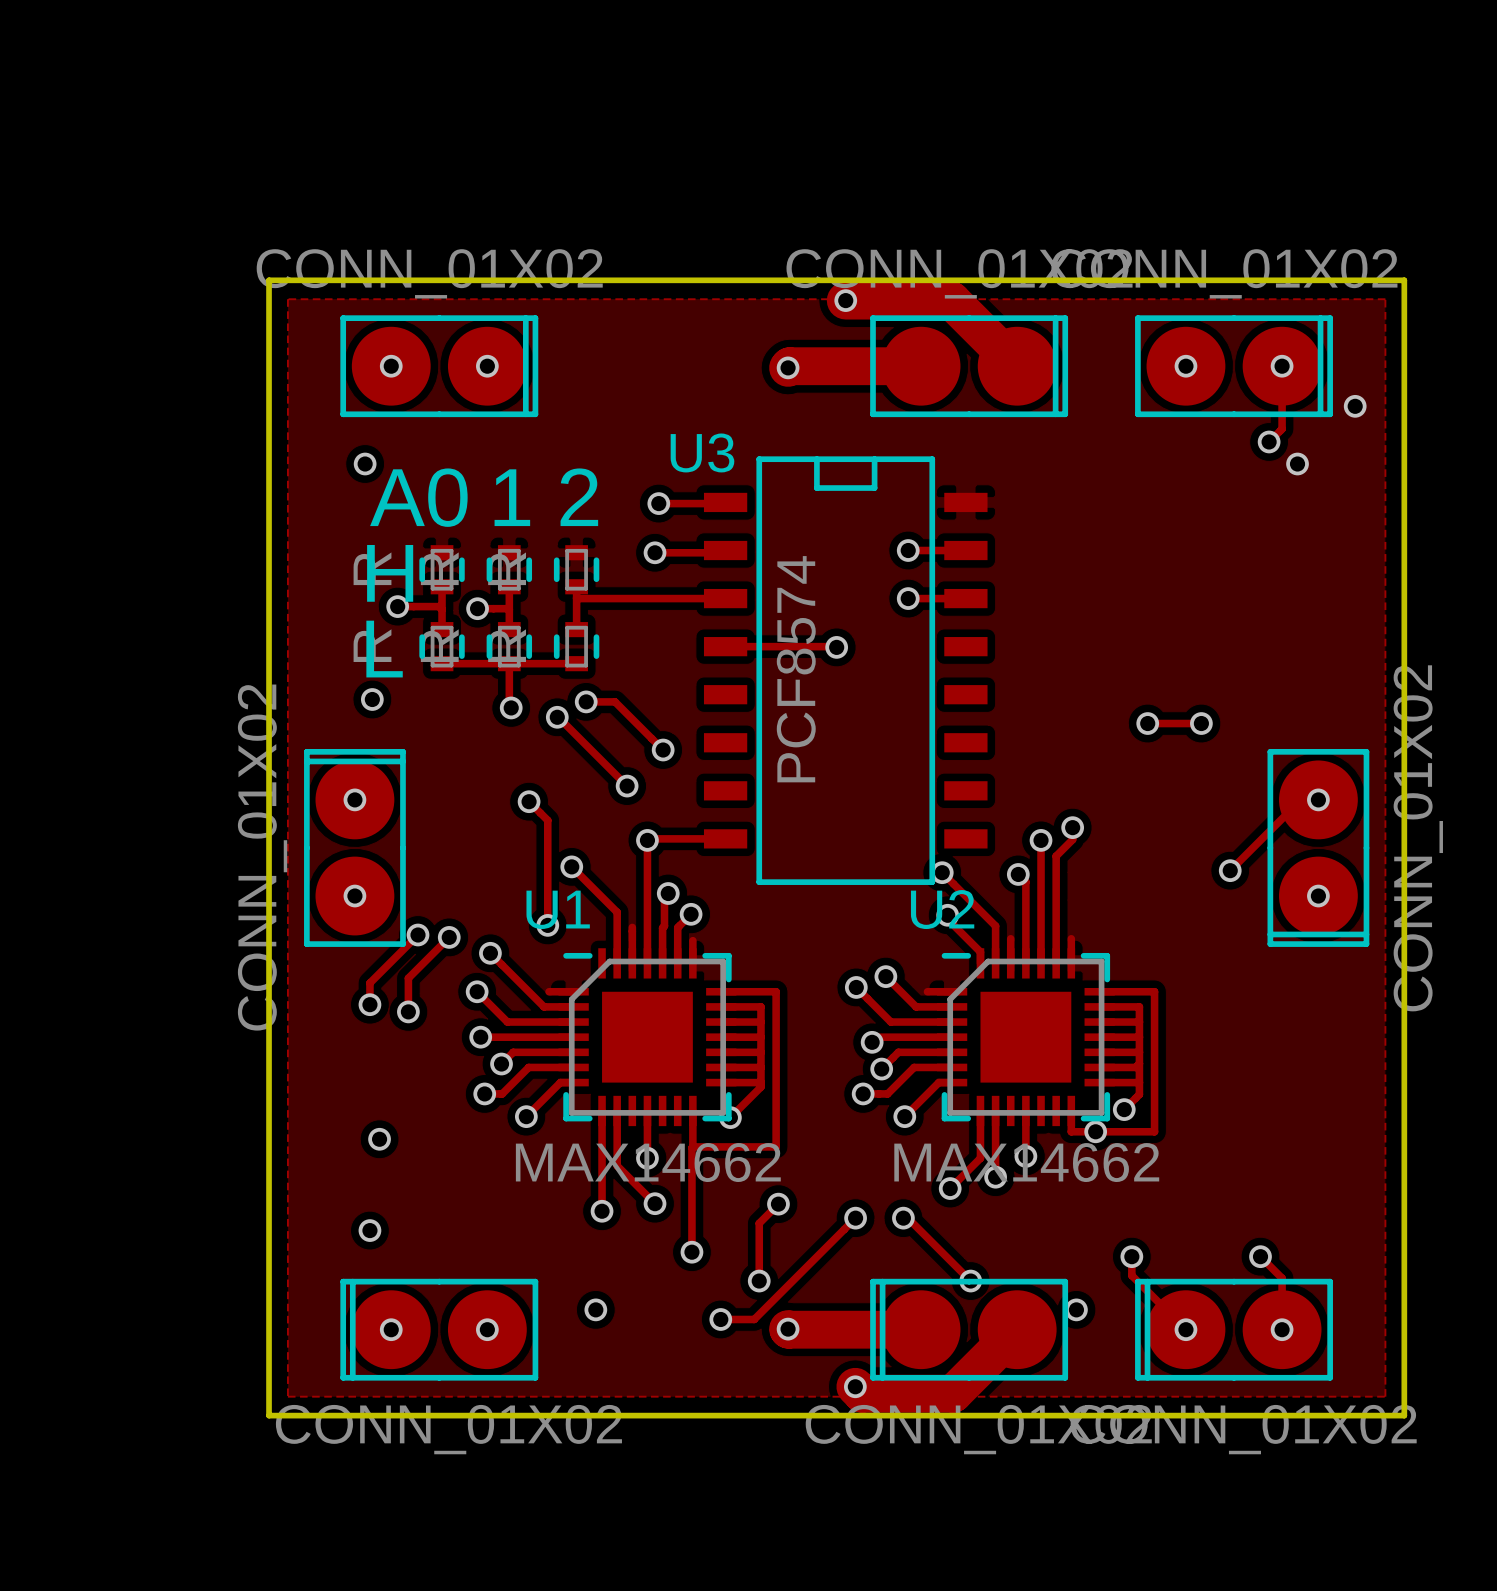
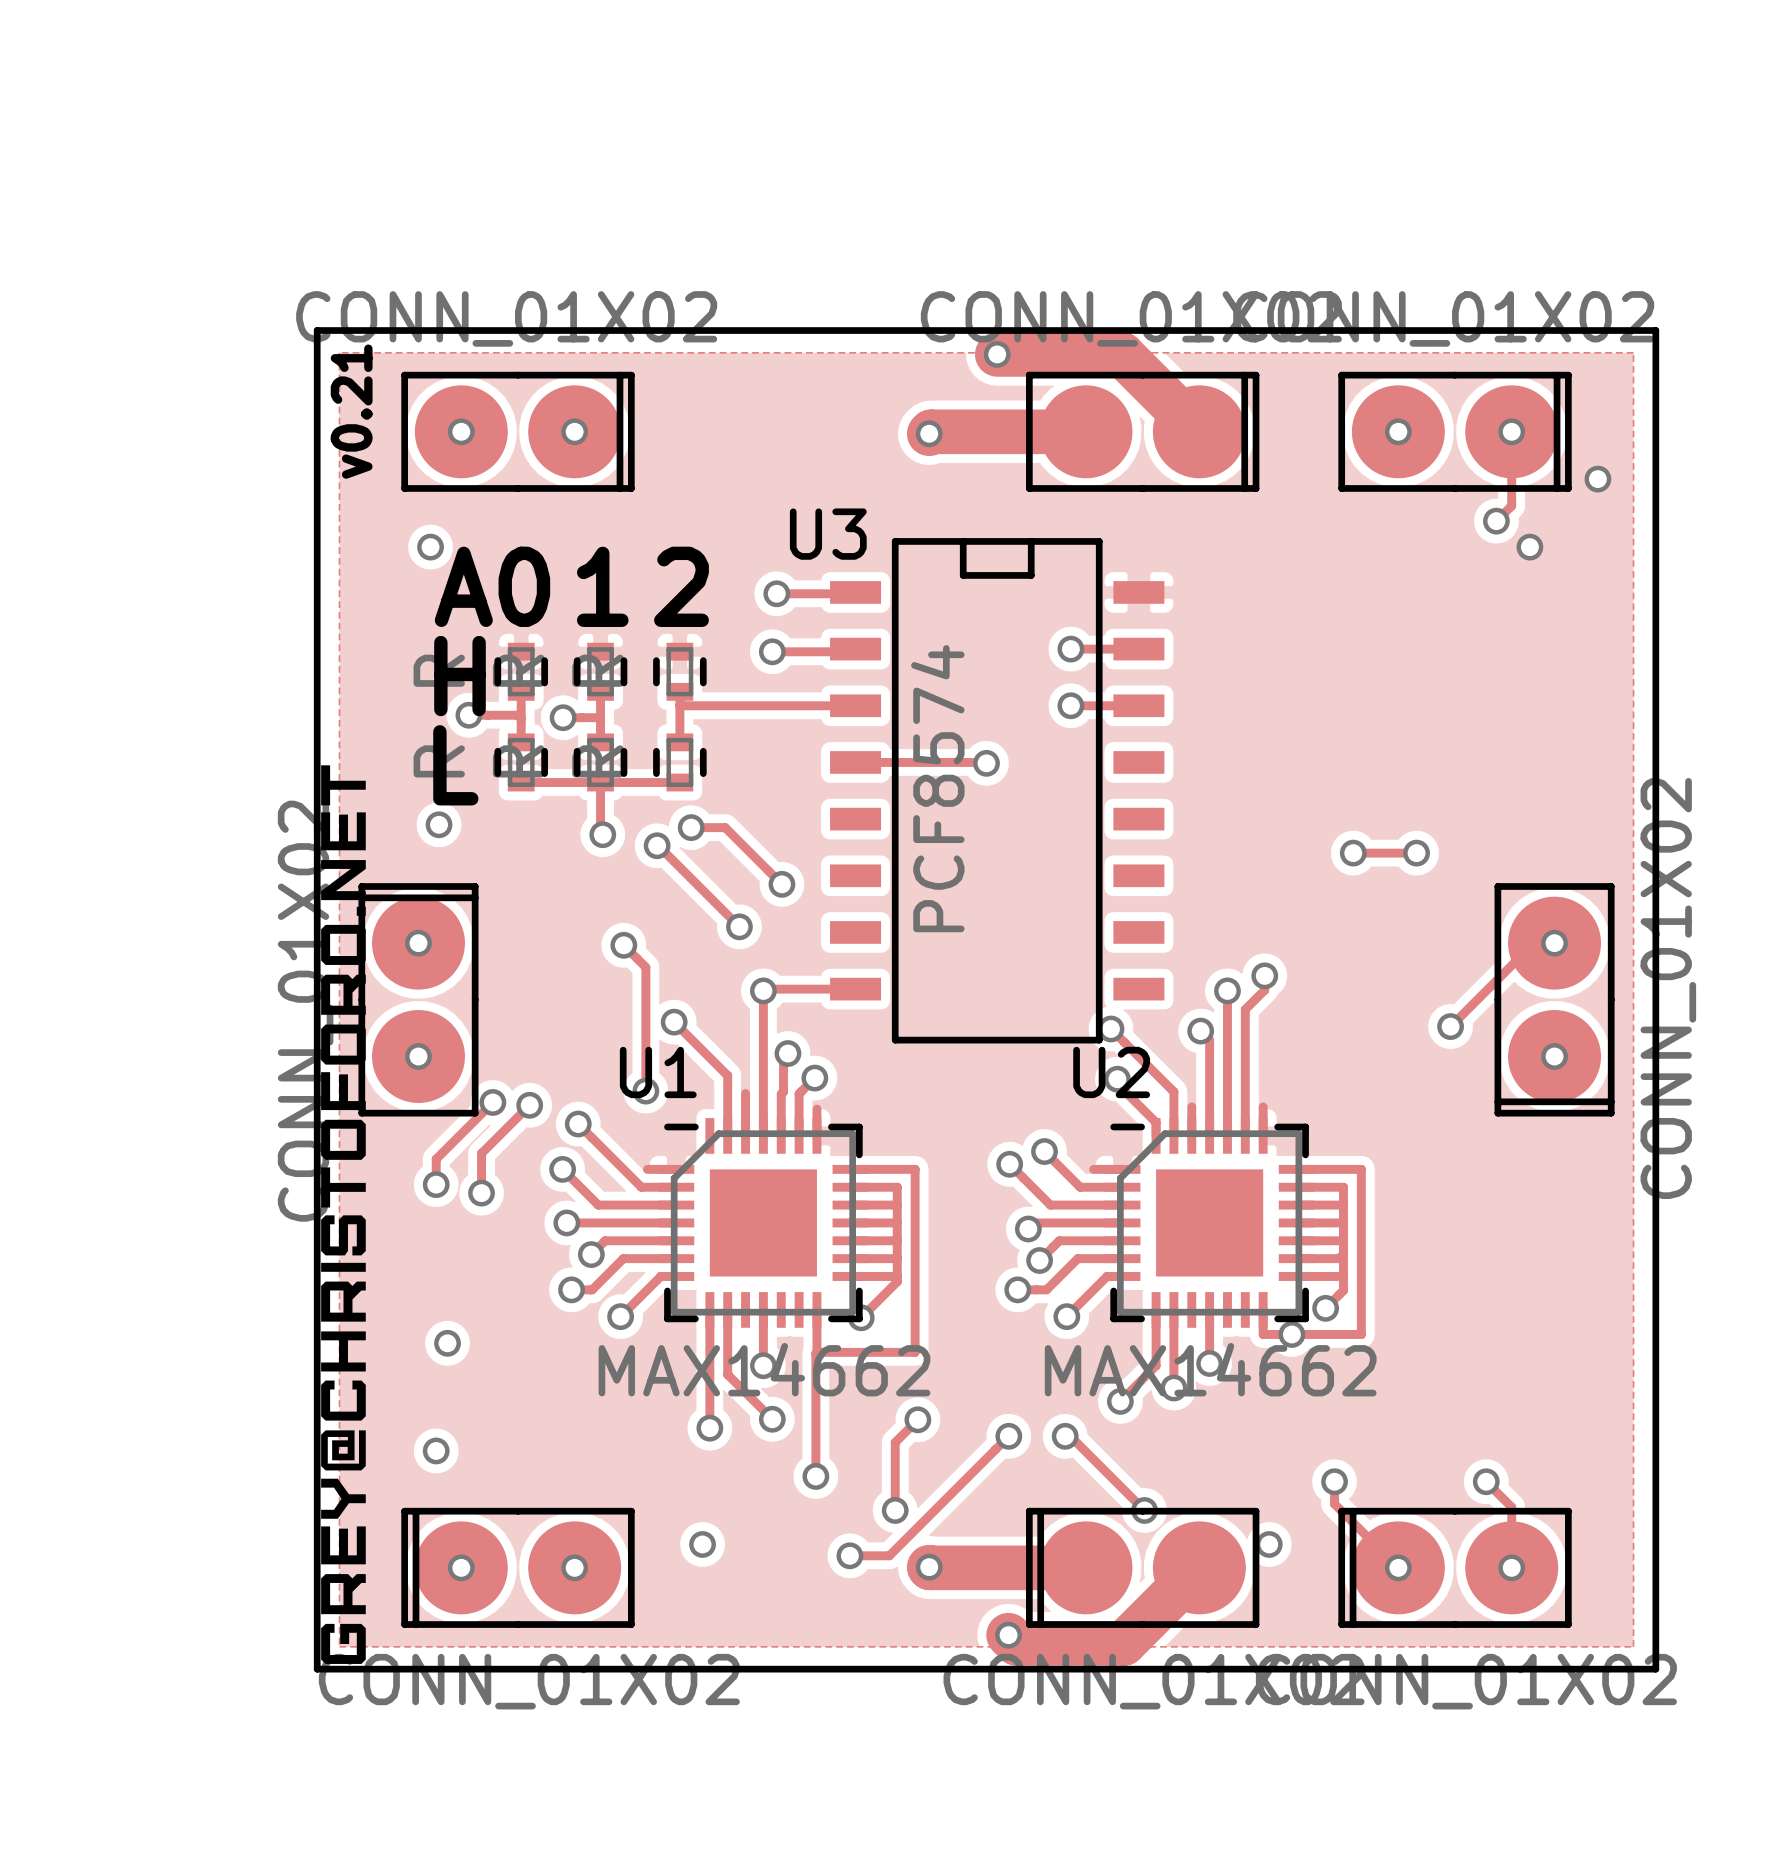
text: none -> v0.21 (351, 411)
drawing: none -> [321, 765, 366, 1664]

